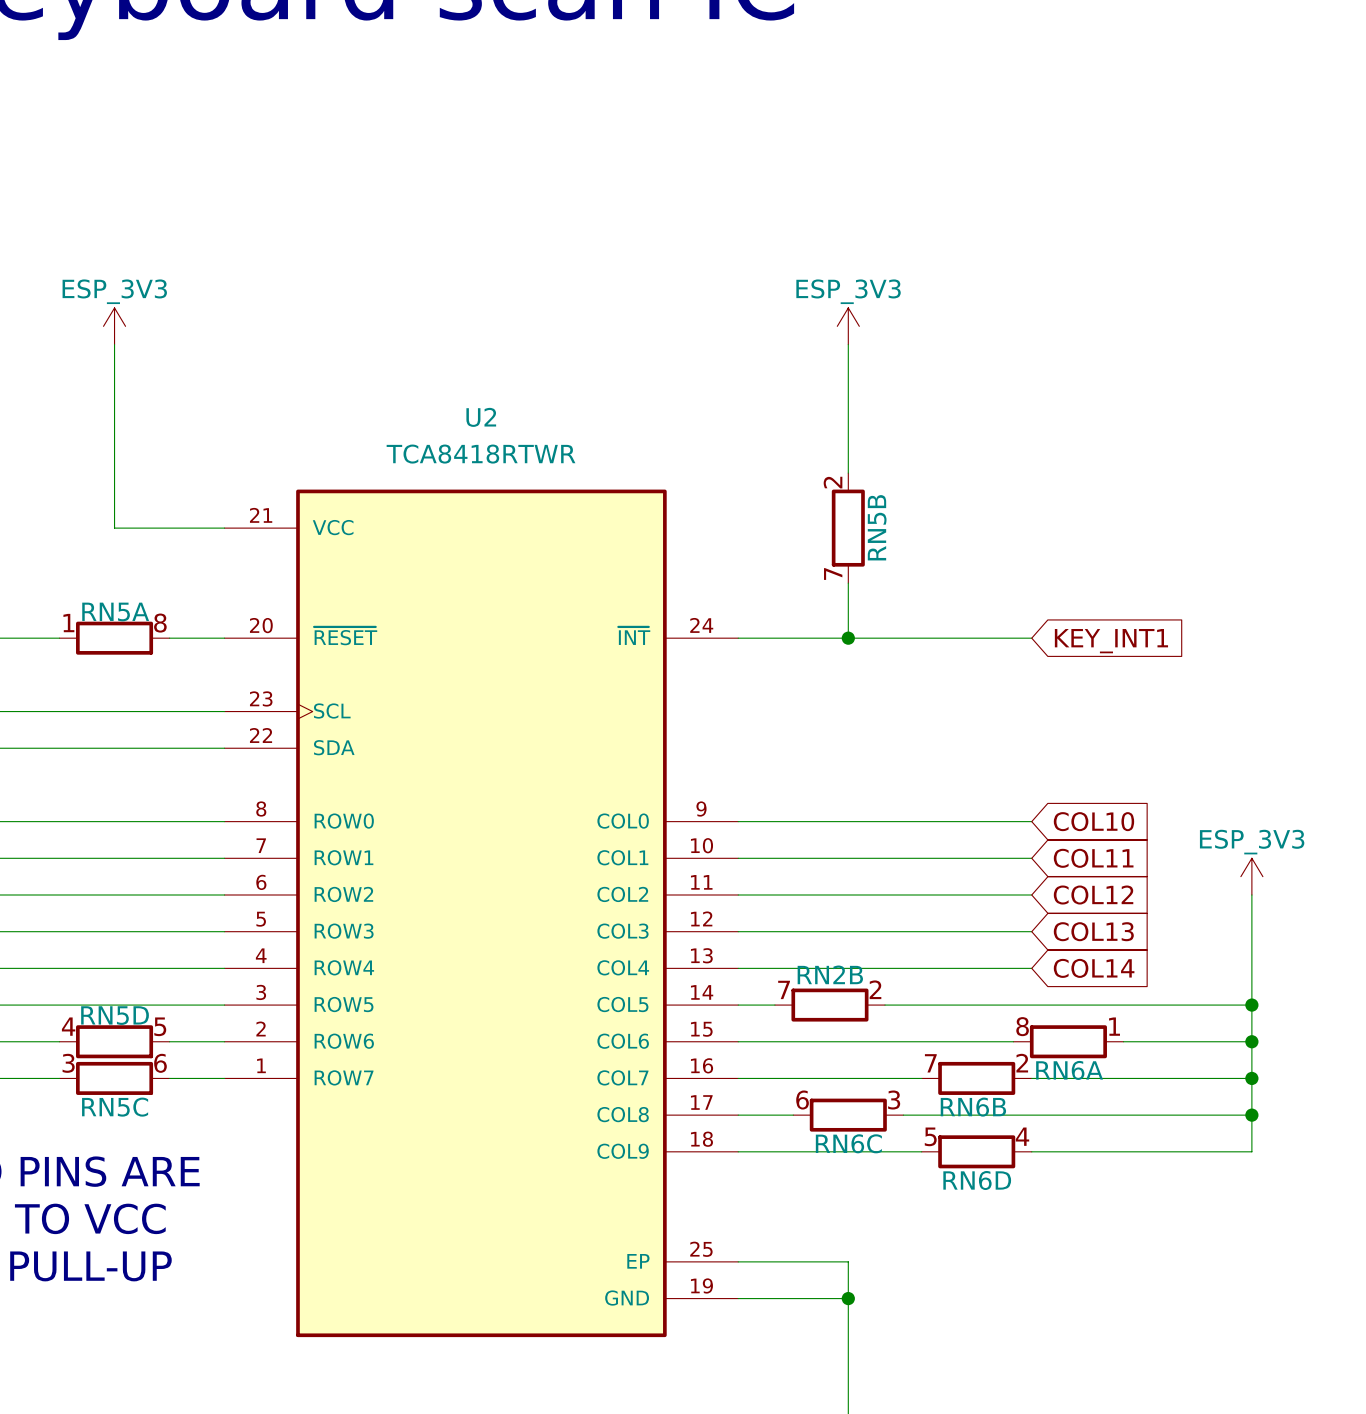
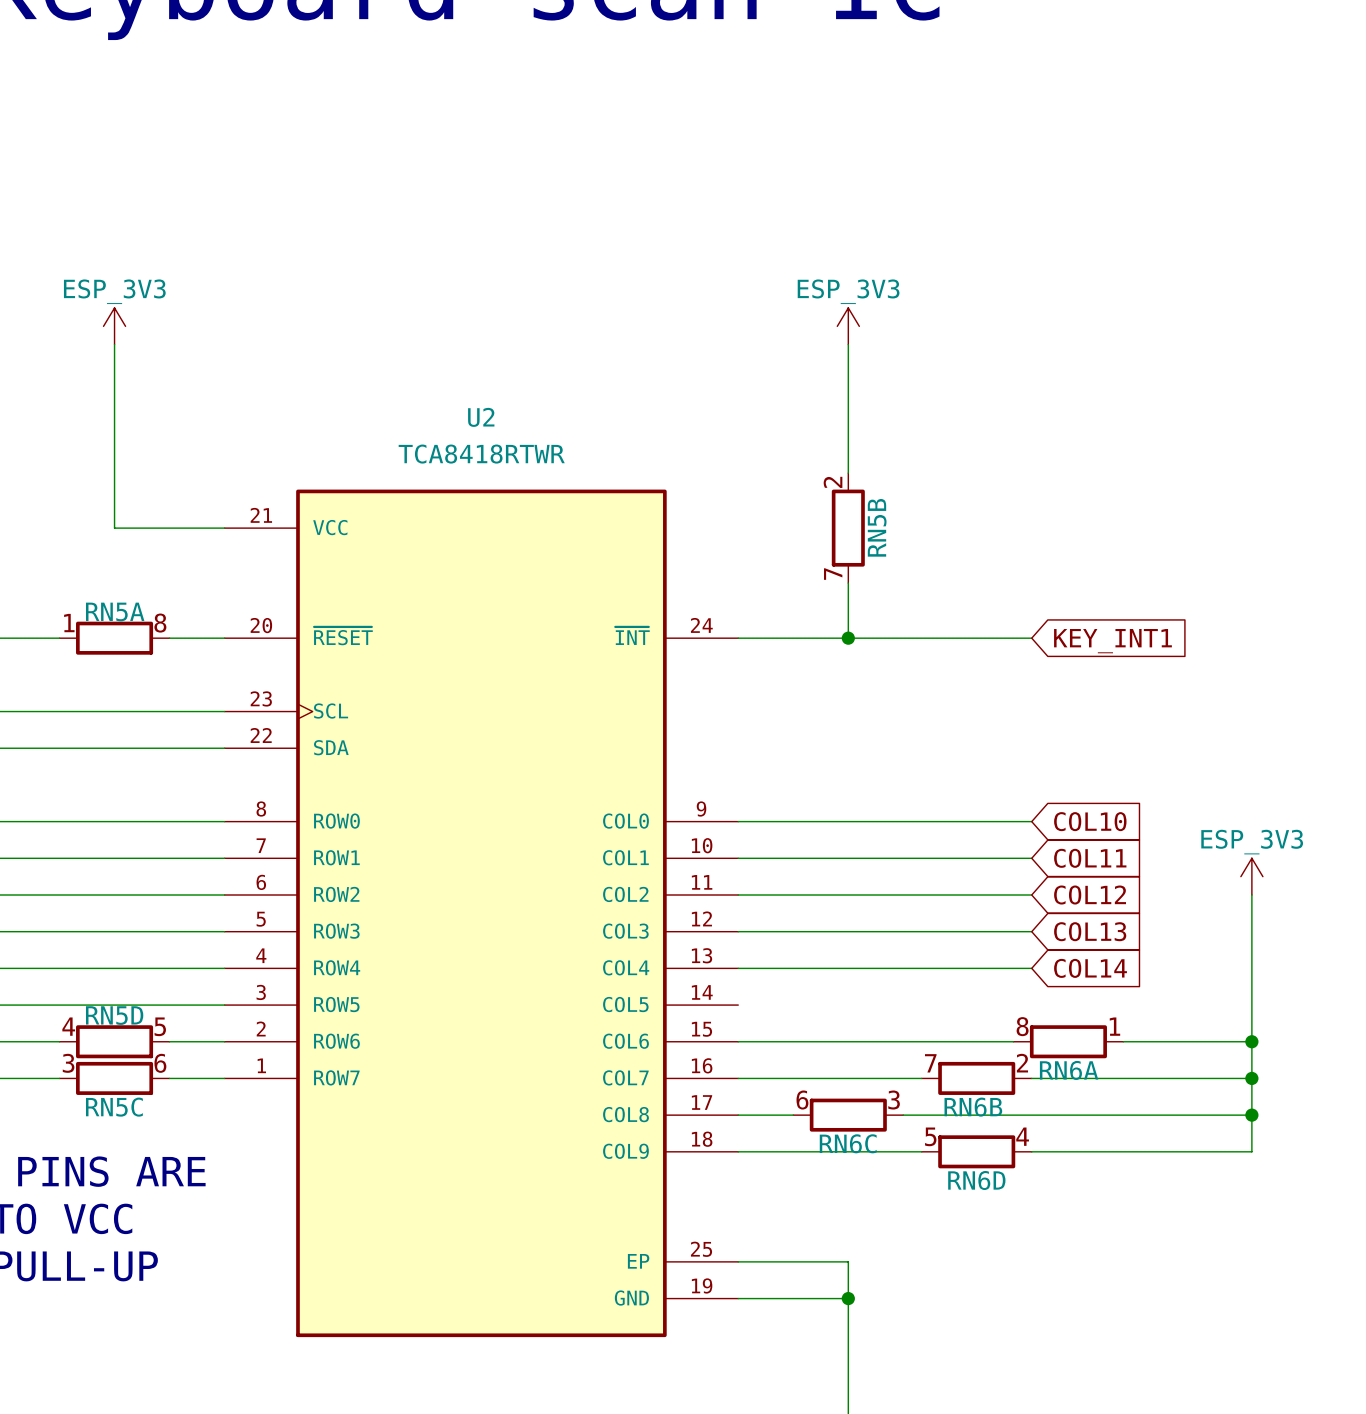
wire: (738, 1005) (774, 1005) -> none
RN2B: (829, 1005) -> none
wire: (885, 1005) (1251, 1005) -> none
junction: (1251, 1005) -> none

